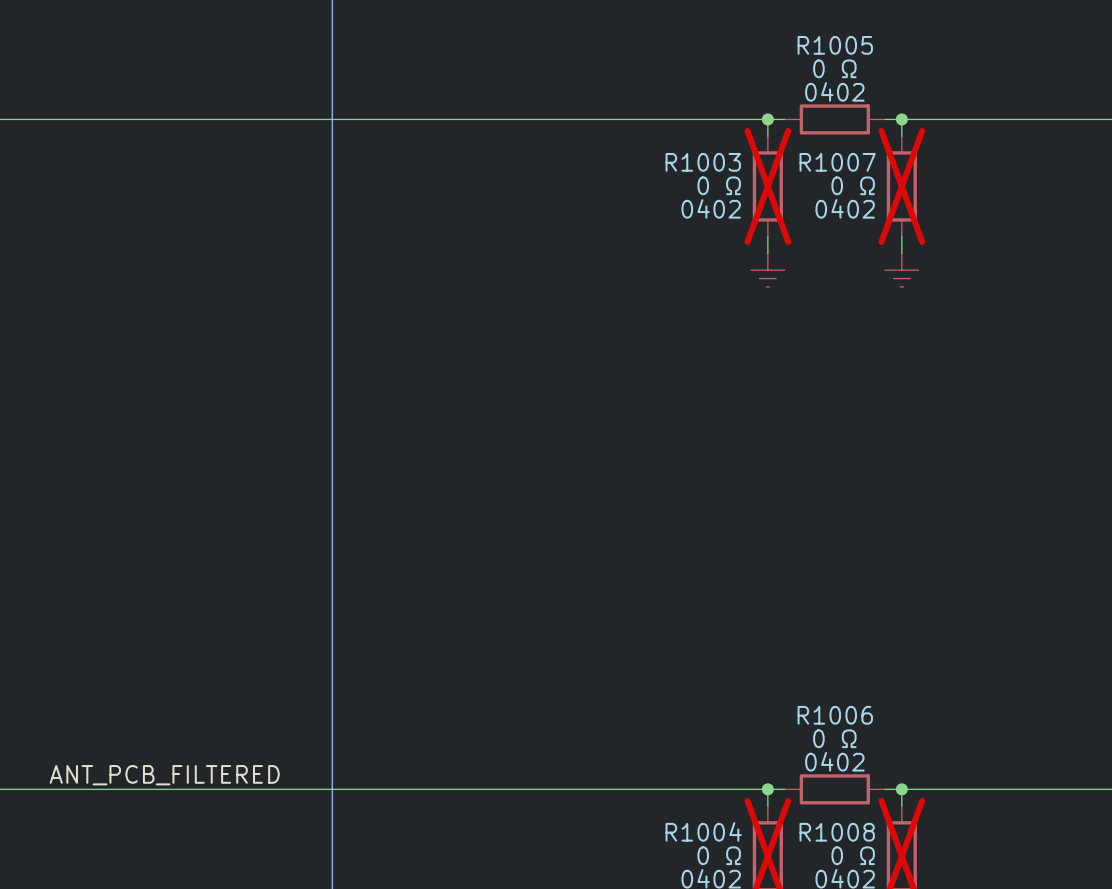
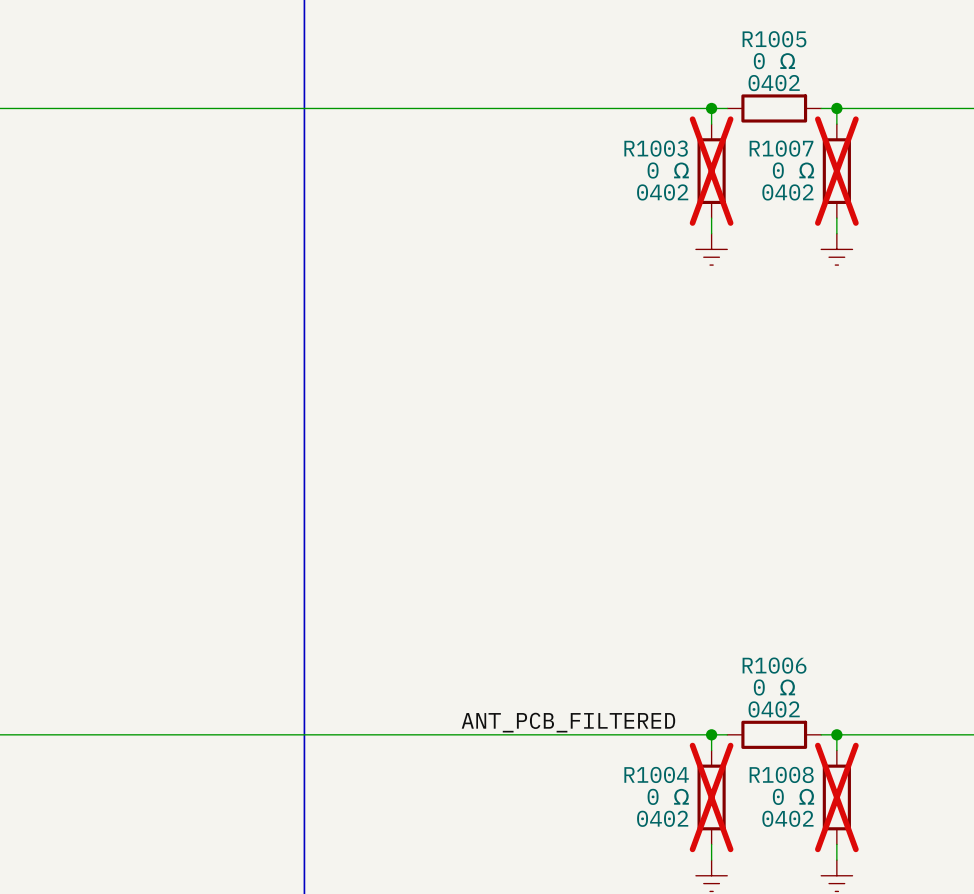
label: ANT_PCB_FILTERED (164, 775) -> none
label: none -> ANT_PCB_FILTERED (568, 722)

